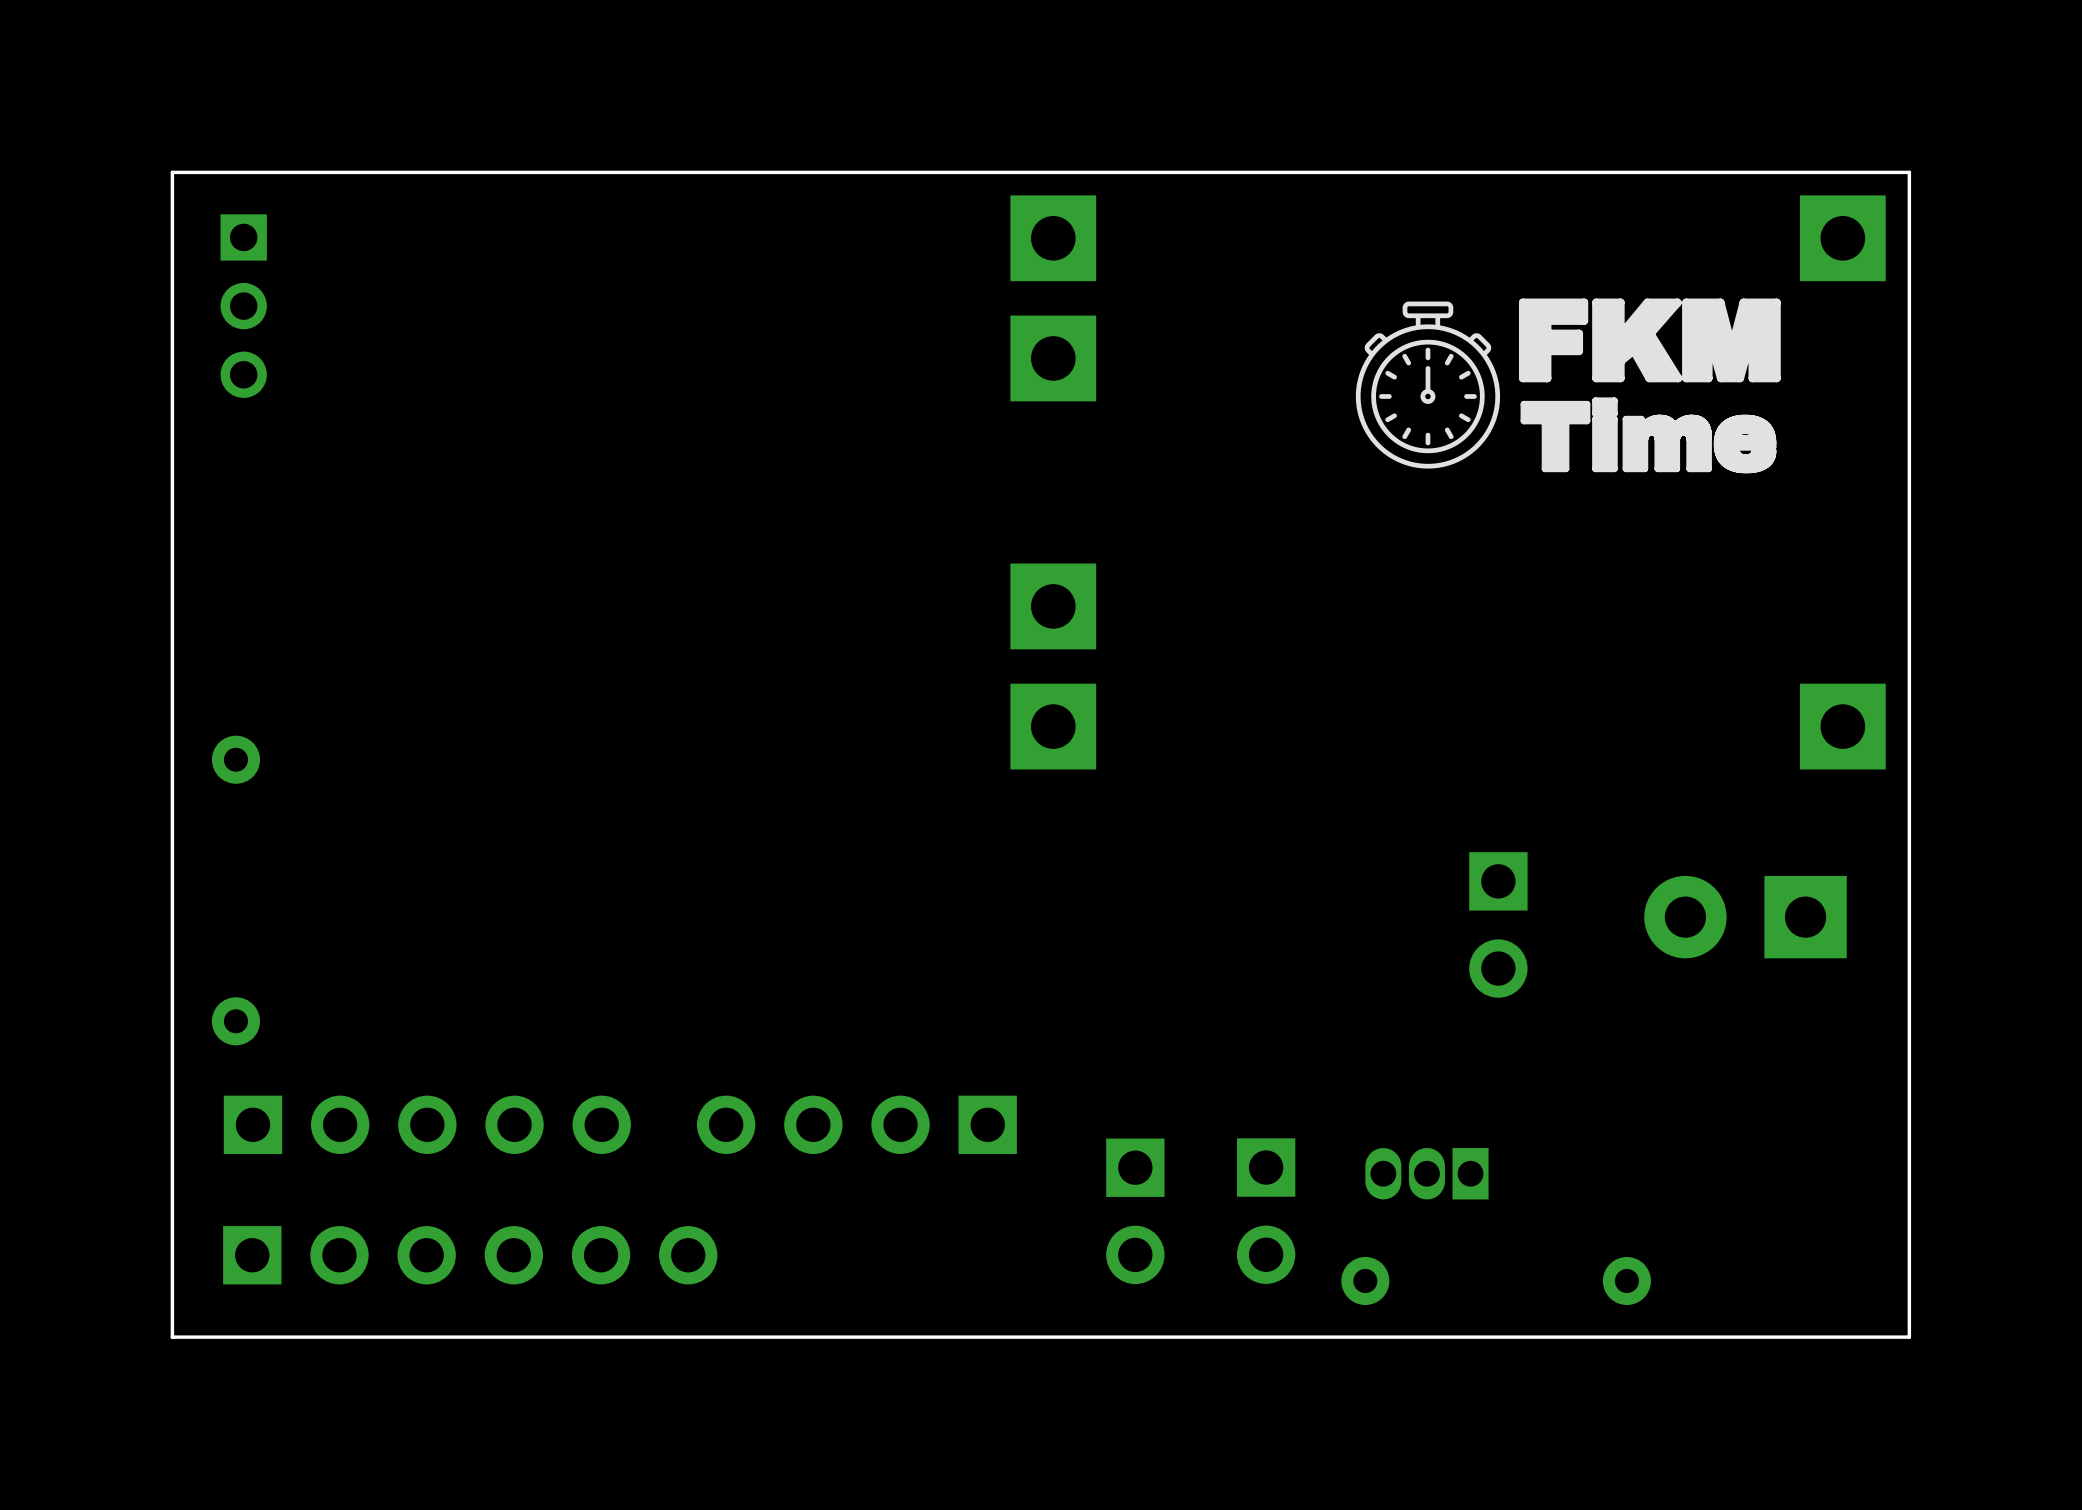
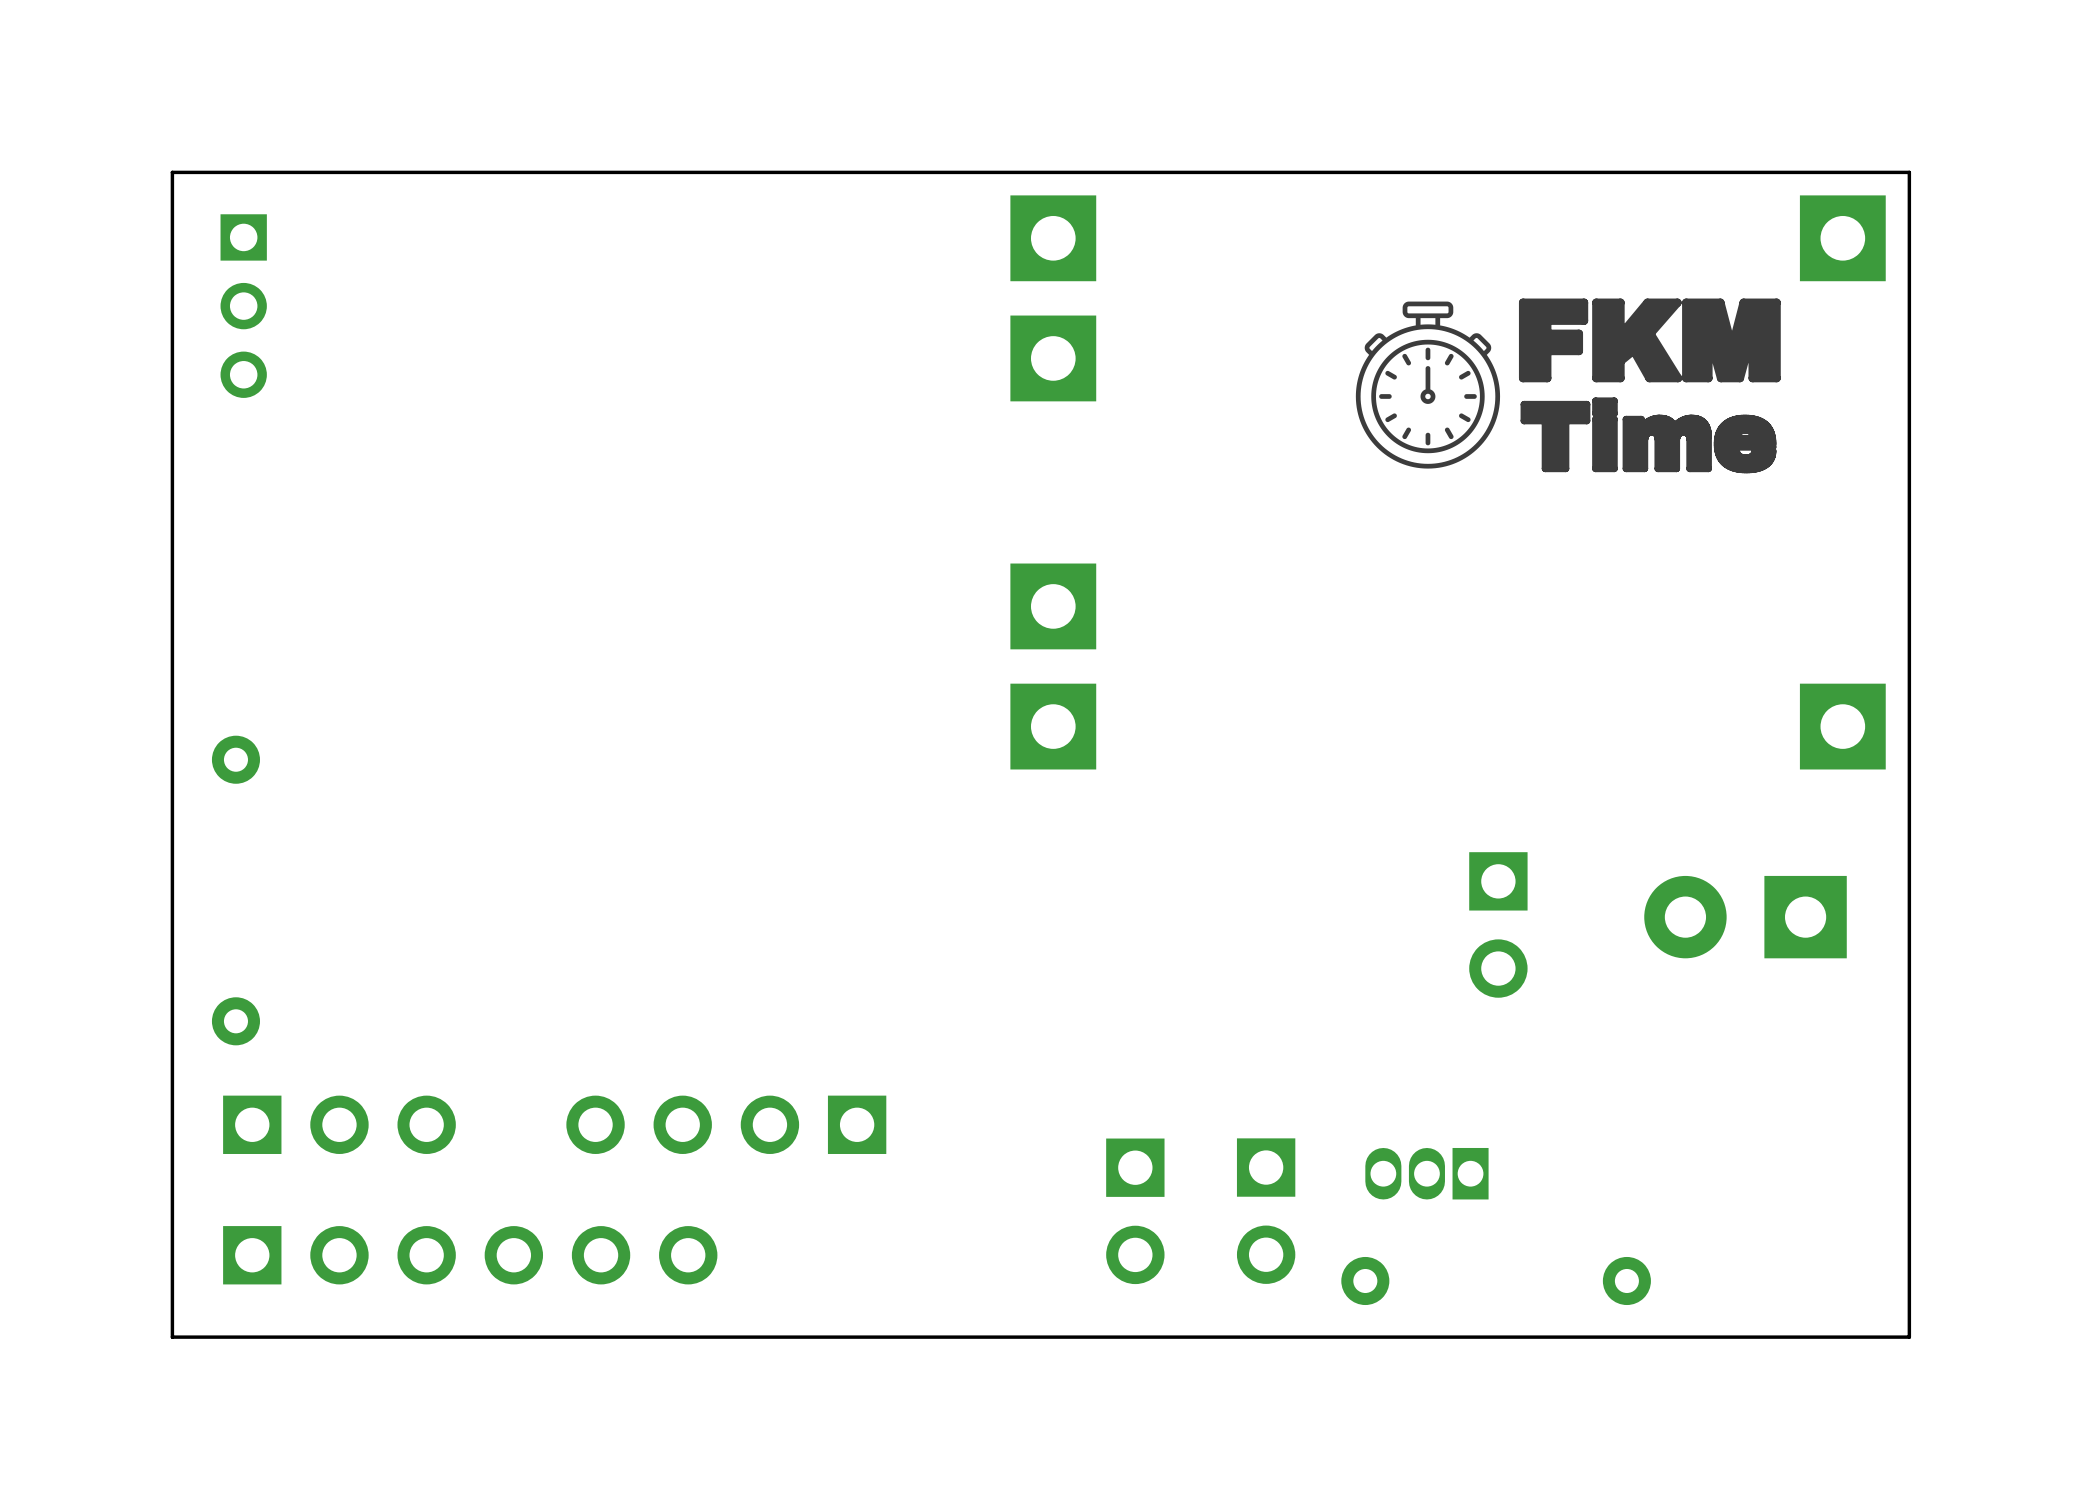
part: none -> (339, 1124)
part: (427, 1124) -> none
part position: (856, 1124) -> (726, 1124)

